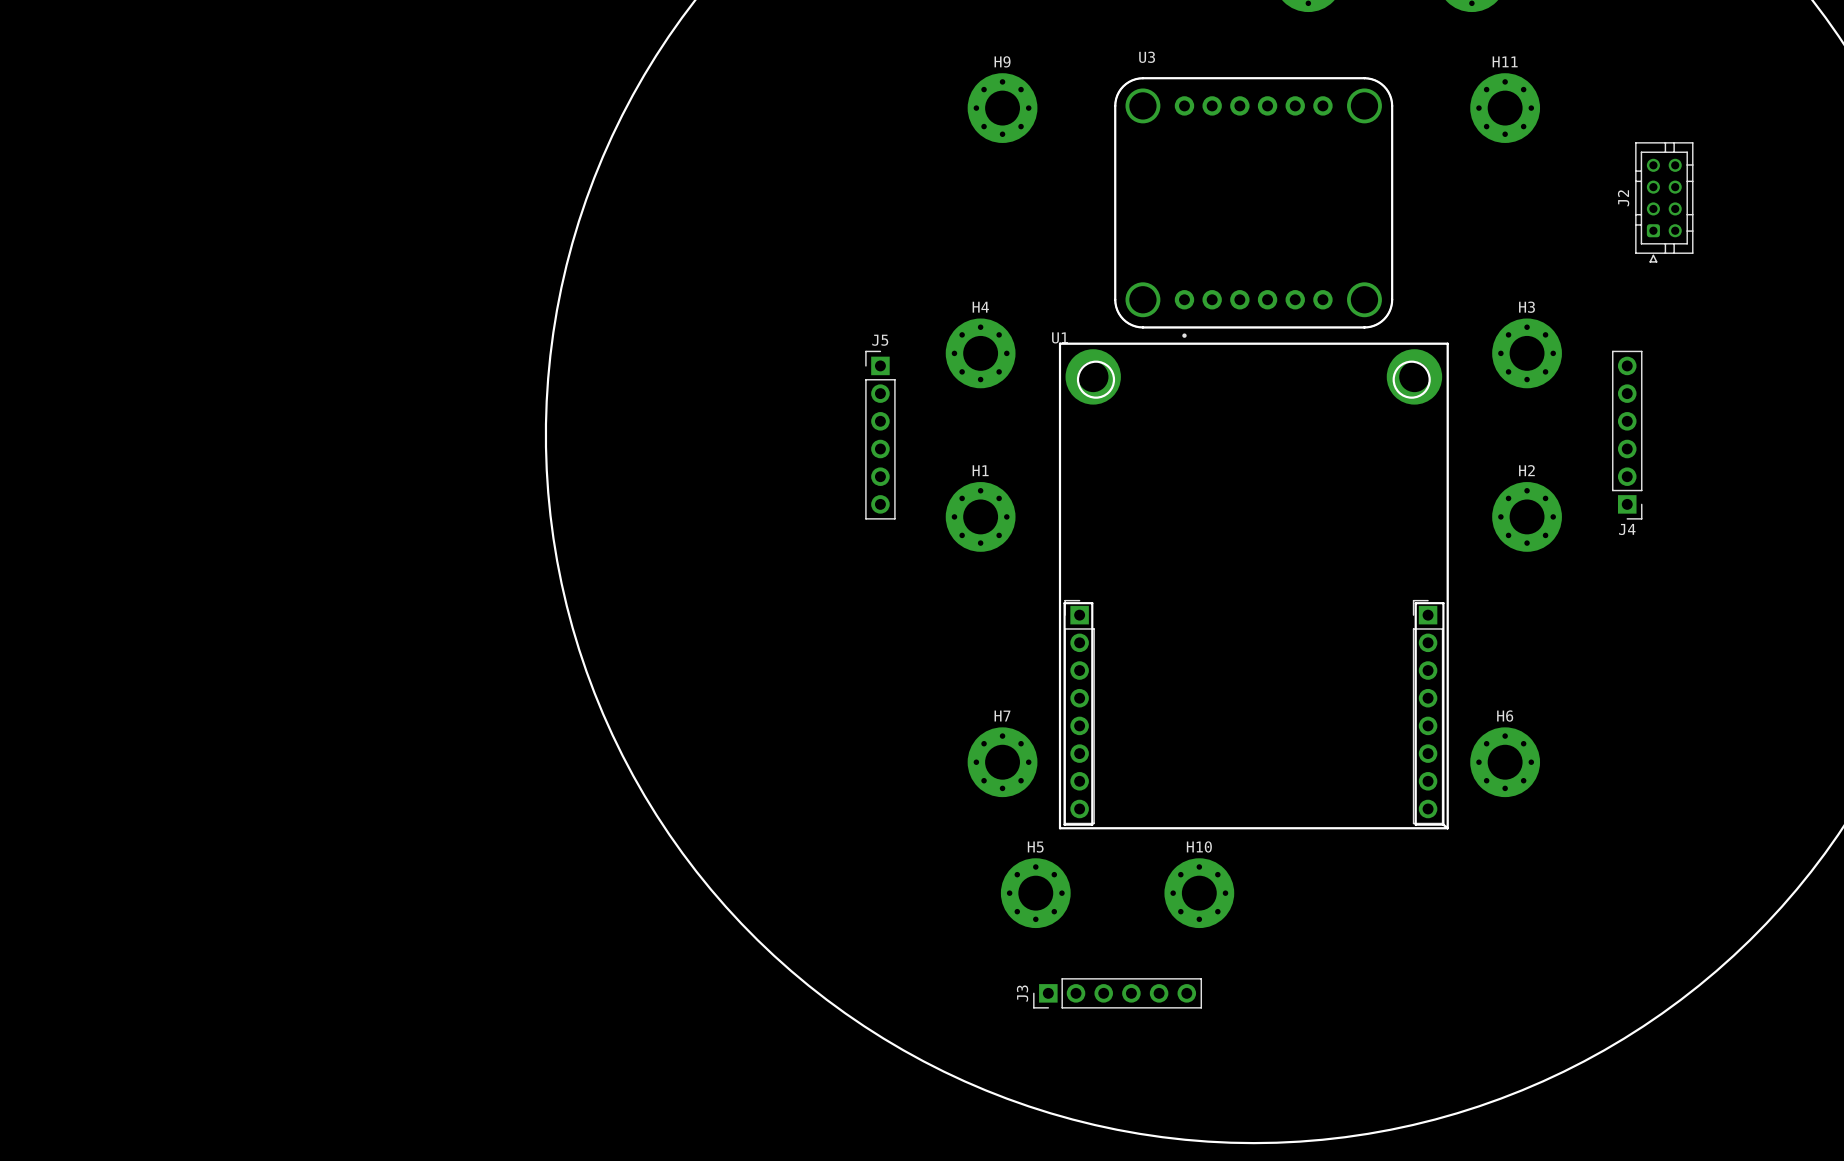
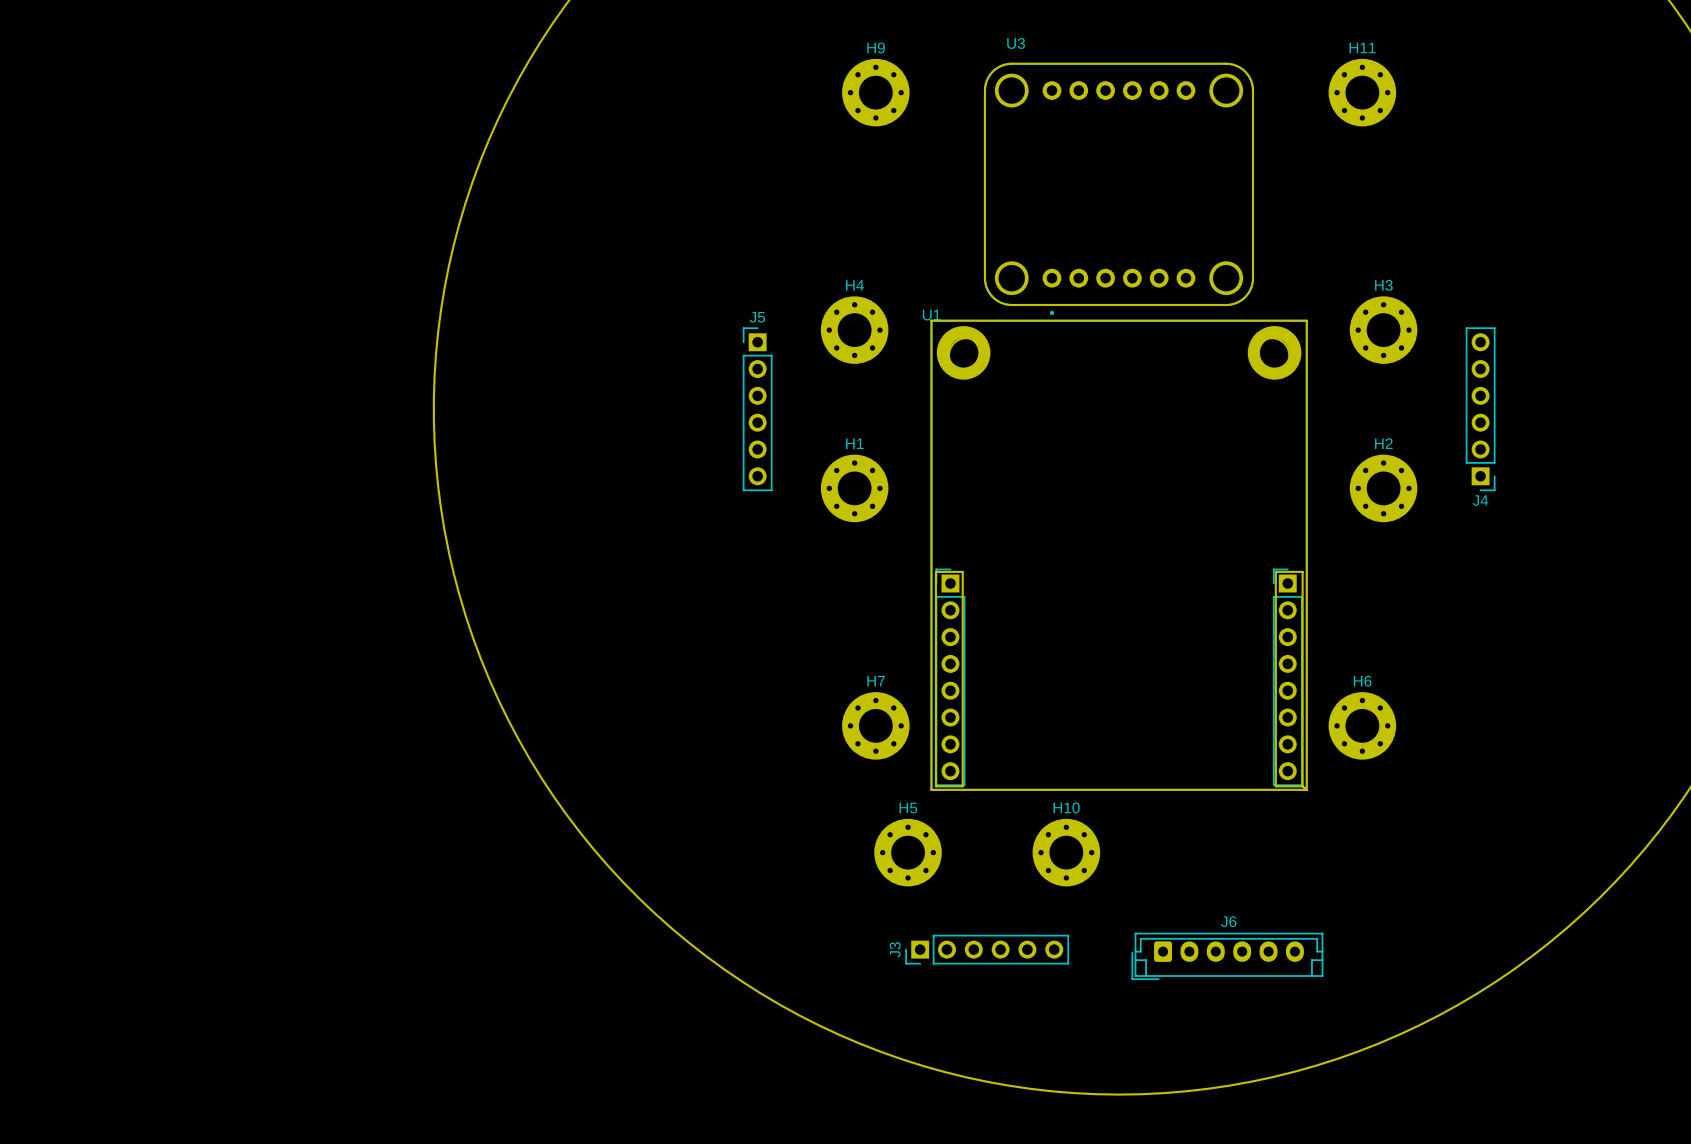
J2: (1664, 202) -> none
J6: none -> (1227, 956)

